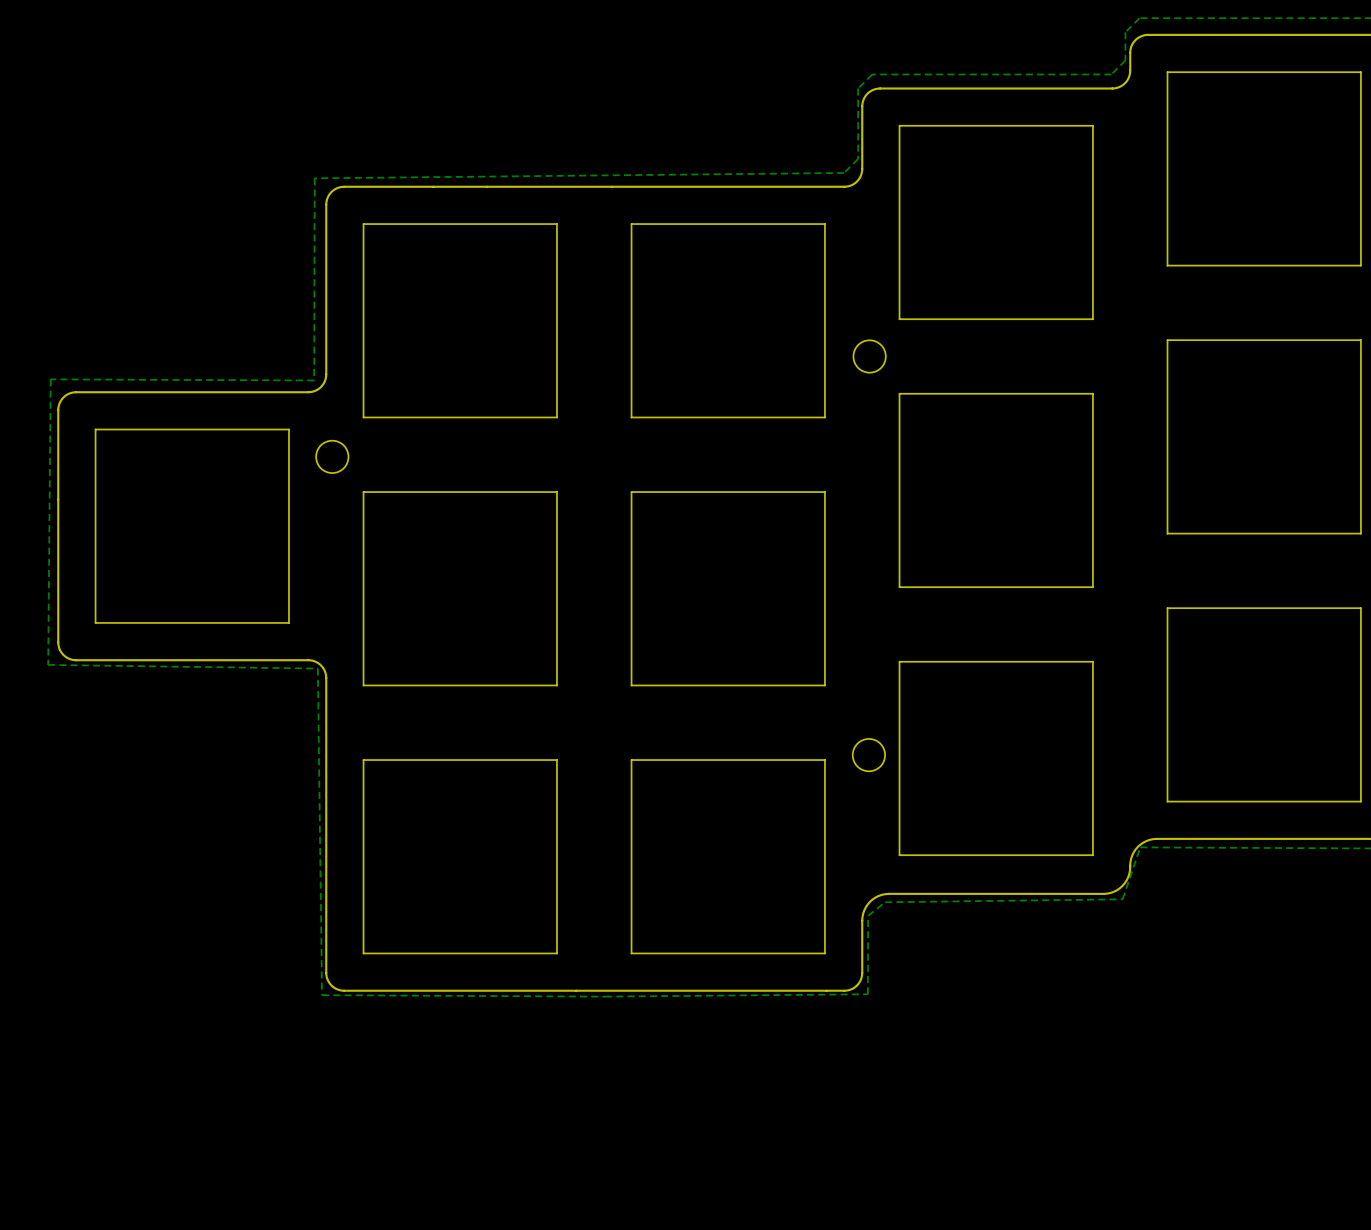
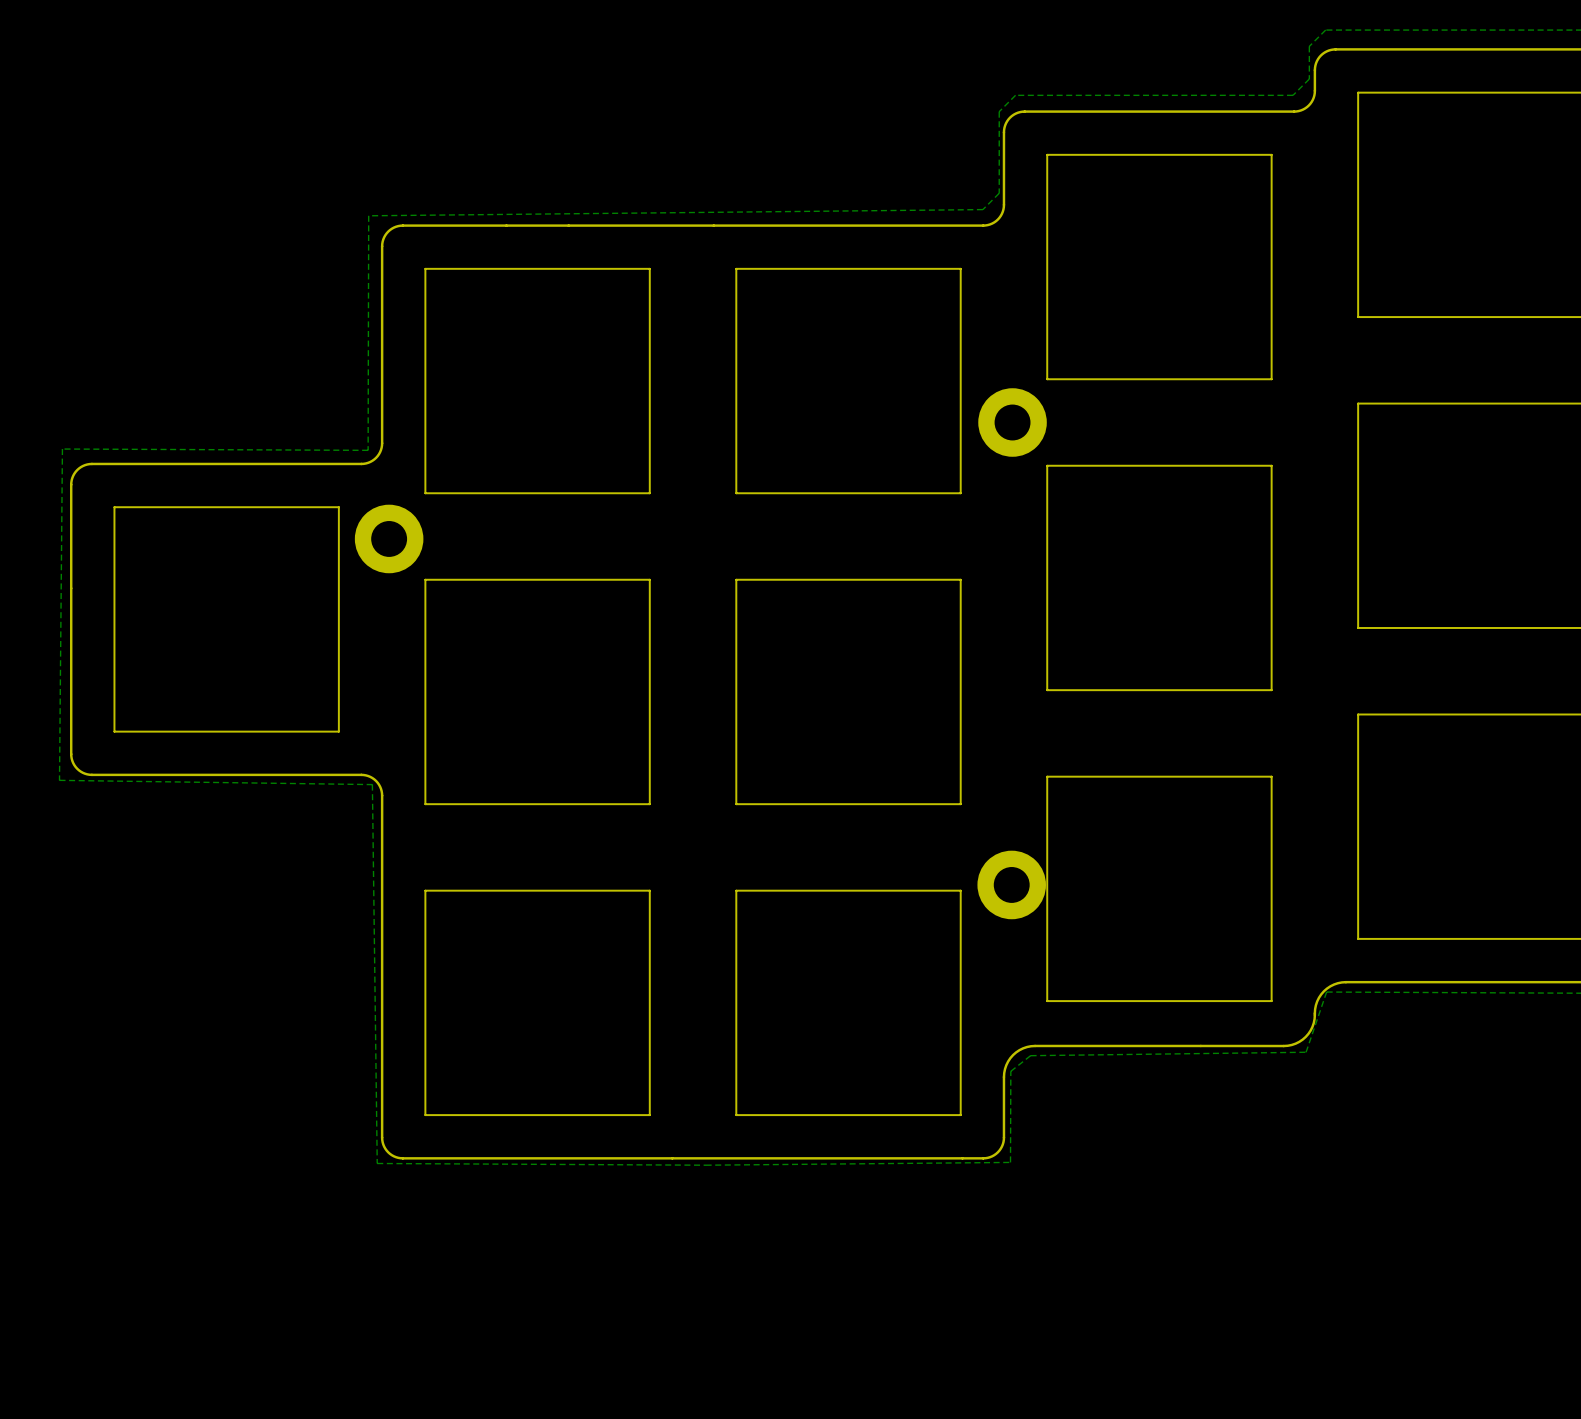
drawing: [852, 339, 887, 374] -> none
part: none -> (1012, 422)
drawing: [315, 440, 350, 474] -> none
part: none -> (389, 538)
drawing: [852, 738, 886, 772] -> none
part: none -> (1011, 884)

